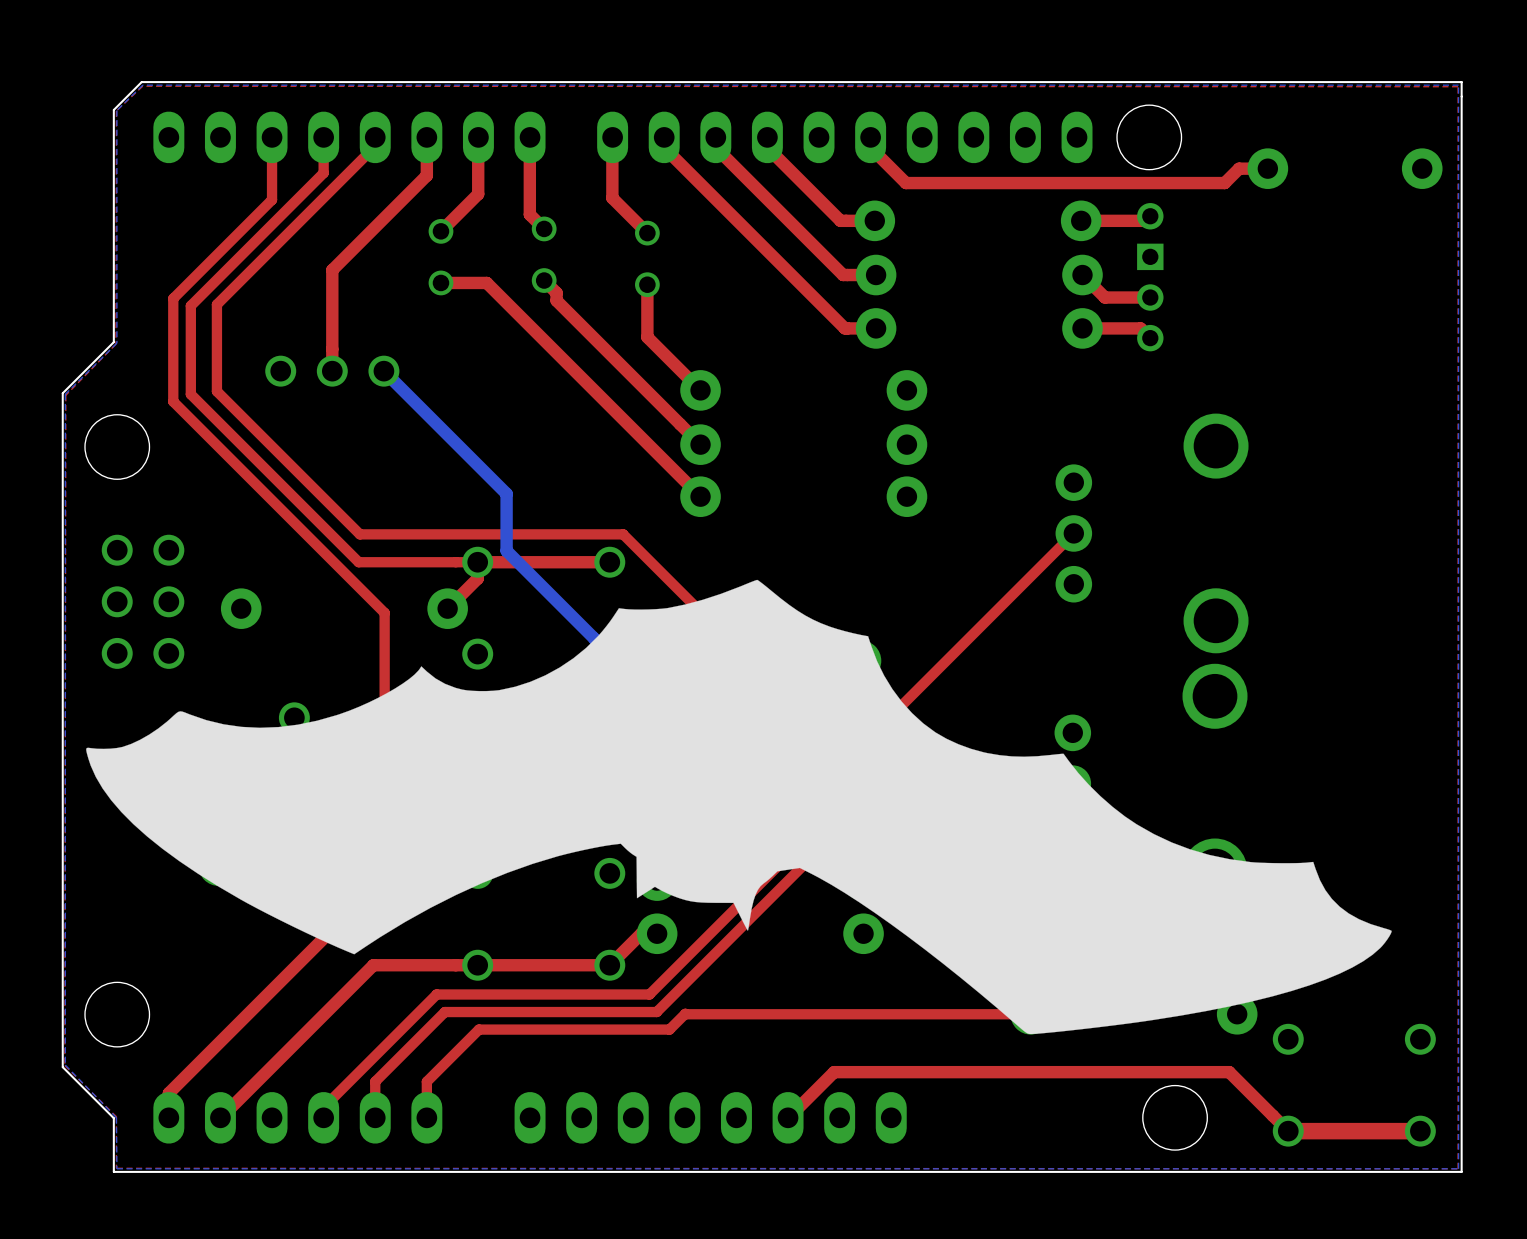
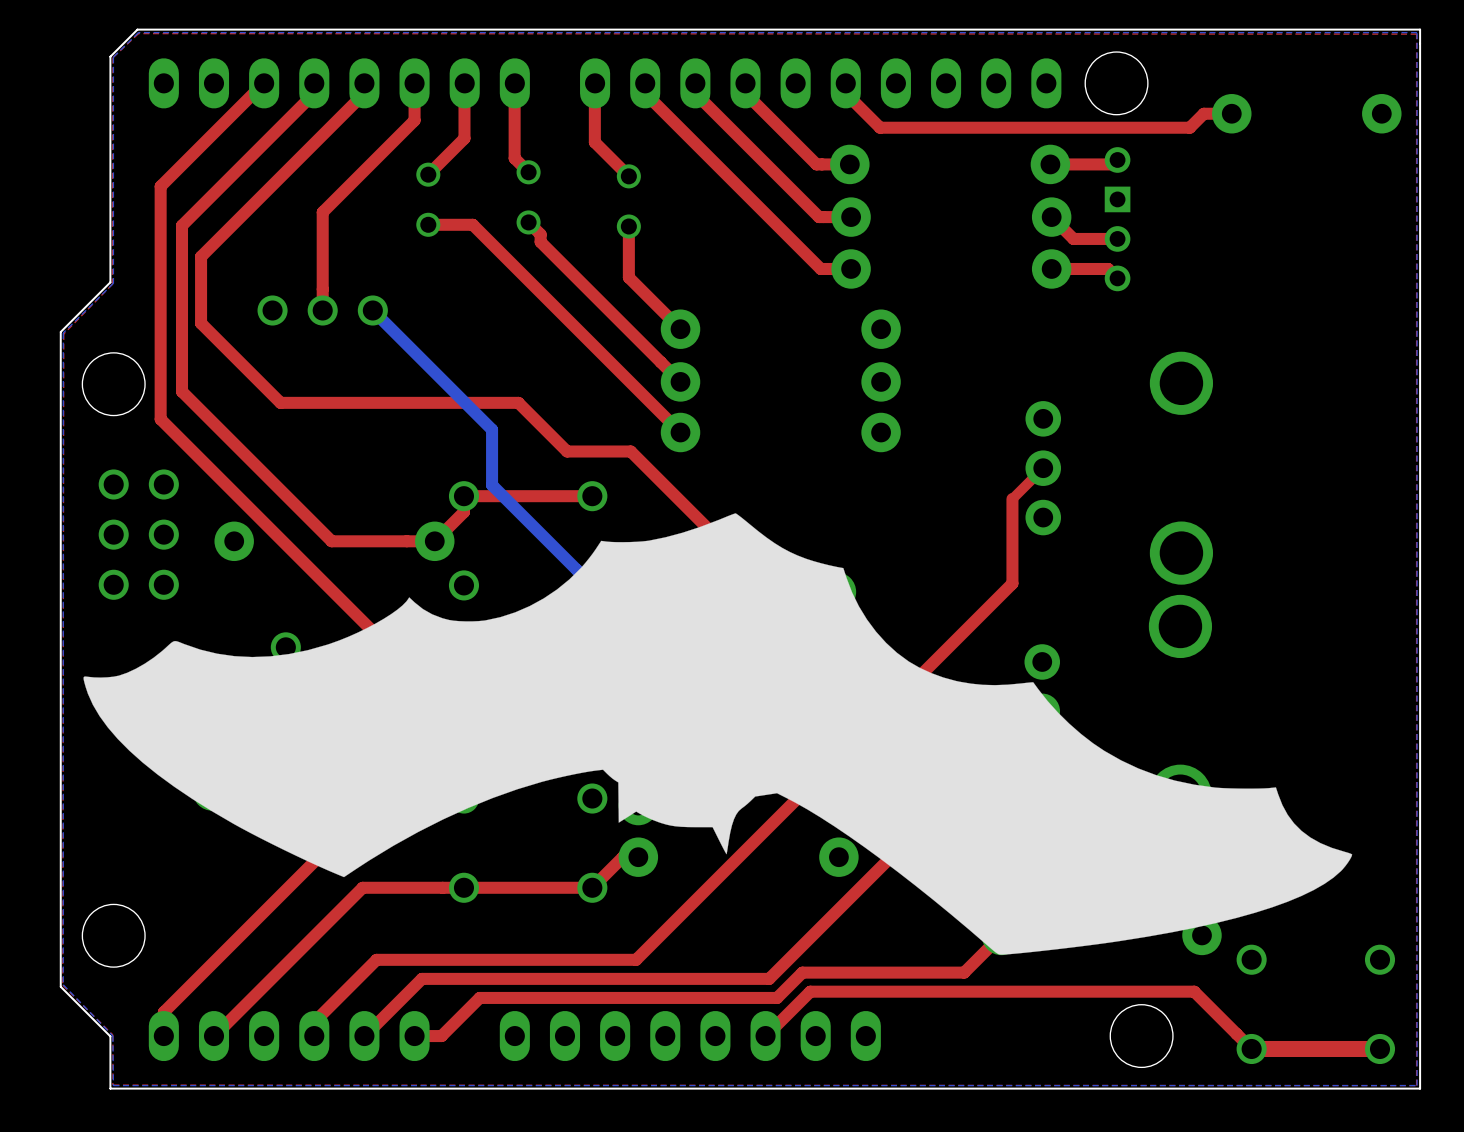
top track: (272, 137) (272, 199) (173, 298) (173, 401) (384, 612) (384, 716) (462, 794) -> (263, 83) (160, 186) (160, 419) (386, 644) (386, 660) (448, 721)
top track: (375, 146) (216, 304) (216, 391) (359, 534) (623, 534) (749, 660) (793, 660) -> (364, 91) (201, 256) (201, 323) (280, 402) (518, 402) (567, 451) (630, 451) (771, 591)
top track: (323, 147) (323, 173) (190, 305) (190, 394) (358, 562) (477, 562) -> (314, 93) (182, 225) (182, 391) (331, 541) (434, 541)
top track: (1042, 565) (879, 727) (879, 764) (649, 994) (436, 994) (323, 1107) -> (1012, 499) (1012, 583) (636, 959) (376, 959) (314, 1022) (314, 1026)
top track: (1072, 783) (885, 783) (656, 1012) (444, 1012) (375, 1081) (375, 1117) -> (1042, 711) (1024, 729) (1019, 729) (769, 978) (421, 978) (364, 1036)
top track: (1030, 1014) (685, 1013) (669, 1029) (478, 1029) (426, 1081) (426, 1117) -> (1001, 935) (964, 972) (802, 972) (777, 997) (479, 997) (441, 1036) (414, 1036)

